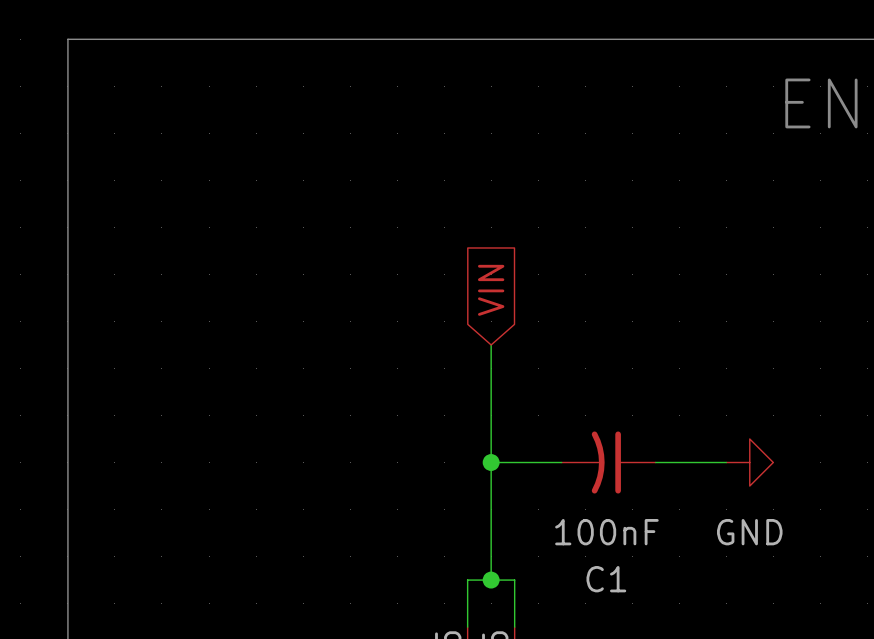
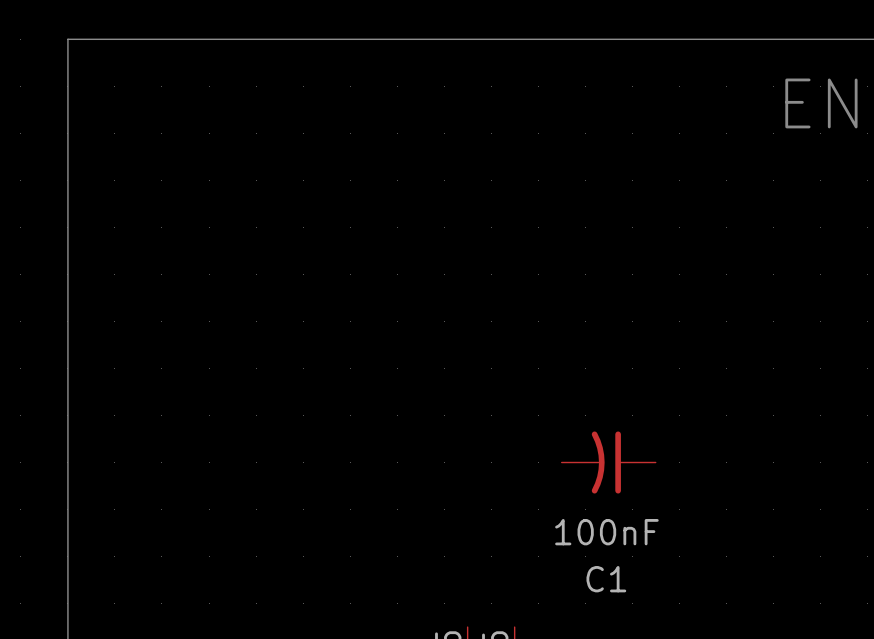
global label: VIN (491, 290) -> none
wire: (491, 344) (491, 580) -> none
wire: (491, 462) (561, 462) -> none
junction: (491, 462) -> none
wire: (655, 462) (726, 462) -> none
power symbol: GND (749, 462) -> none
junction: (491, 580) -> none
wire: (467, 627) (467, 580) (514, 580) (514, 627) -> none

